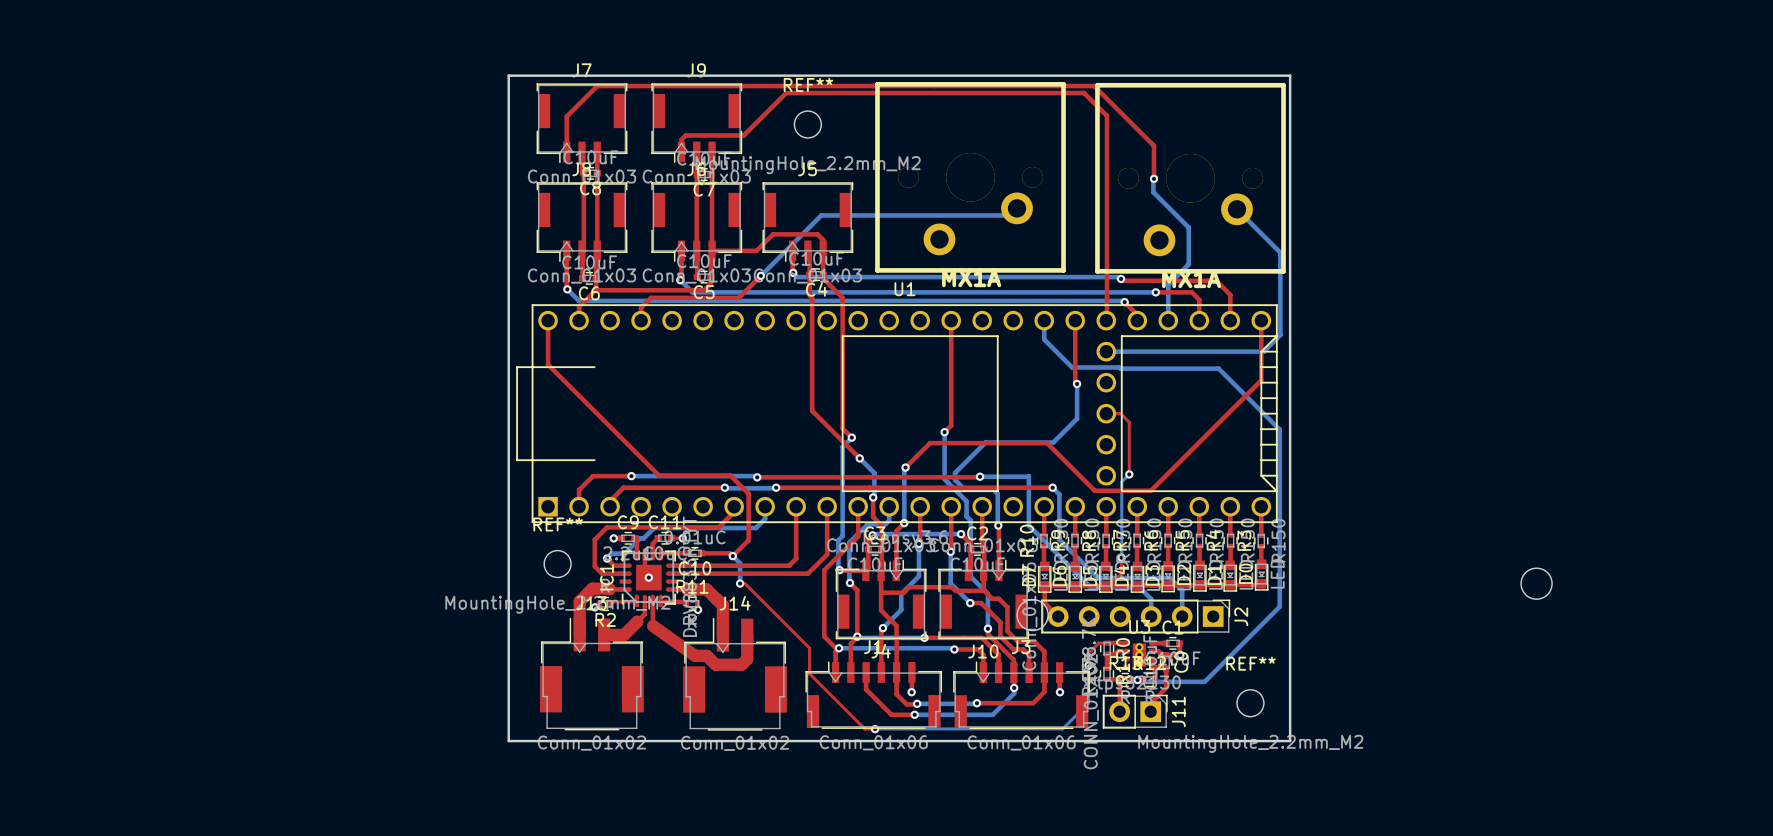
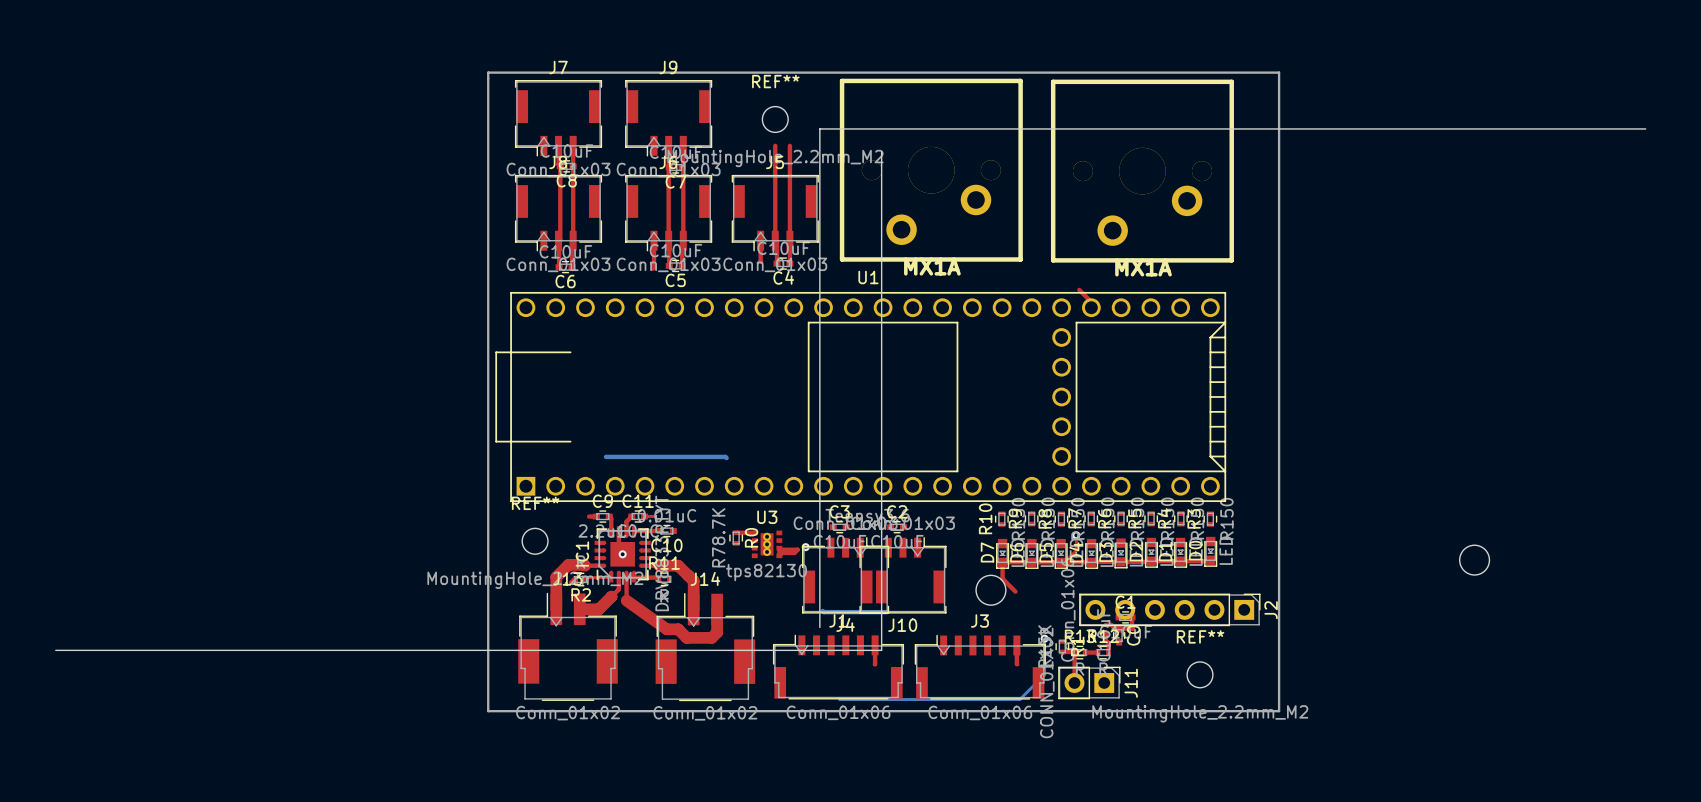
board edge: (508, 75) (508, 741) (1290, 741) (1290, 75) (508, 75) -> none
line: none -> (488, 72) (488, 711) (1279, 711) (1279, 72) (488, 72)
board edge: none -> (1645, 128) (819, 128) (819, 627)
top track: (566, 151) (566, 116) (597, 86) (1094, 86) (1154, 145) (1154, 178) -> none
top track: (681, 151) (681, 139) (685, 135) (743, 135) (786, 93) (1084, 93) (1106, 115) (1106, 320) -> none
top track: none -> (775, 145) (775, 240)
board edge: none -> (881, 151) (881, 650) (55, 650)
bottom track: (1154, 178) (1153, 192) (1188, 227) (1188, 264) (1168, 284) (1168, 320) -> none
via: (1154, 178) -> none
bottom track: (1017, 208) (1009, 215) (821, 215) (760, 275) -> none
bottom track: (1237, 209) (1280, 252) (1280, 335) (1263, 351) (1106, 351) -> none
top track: (823, 239) (817, 234) (773, 234) (756, 250) (712, 250) -> (789, 230) (789, 145)
top track: (566, 250) (567, 289) -> none
bottom track: (793, 272) (797, 277) (1119, 277) (1121, 278) -> none
via: (793, 272) -> none
top track: (809, 274) (809, 295) (812, 297) (812, 410) (859, 458) -> none
top track: (823, 274) (823, 278) (842, 297) (842, 428) (851, 437) -> none
top track: (760, 275) (738, 297) (650, 297) (641, 307) (641, 320) -> none
via: (760, 275) -> none
top track: (710, 277) (710, 283) (704, 290) (596, 290) (596, 278) -> none
top track: (1121, 278) (1122, 280) (1216, 280) (1230, 294) (1230, 320) -> none
via: (1121, 278) -> none
bottom track: (680, 280) (692, 292) (1155, 292) -> none
via: (680, 280) -> none
bottom track: (567, 289) (578, 300) (1124, 302) -> none
via: (567, 289) -> none
top track: (596, 289) (579, 306) (579, 320) -> none
top track: (1155, 292) (1191, 292) (1199, 299) (1199, 320) -> none
via: (1155, 292) -> none
via: (1124, 302) -> none
top track: (548, 320) (548, 364) (658, 475) (730, 475) (748, 493) (748, 540) (732, 556) (730, 553) (701, 553) -> none
top track: (951, 320) (951, 425) (944, 432) -> none
bottom track: (1044, 320) (1044, 339) (1072, 367) (1218, 368) (1279, 429) (1279, 606) (1204, 681) (1139, 681) (1137, 680) -> none
top track: (1075, 320) (1075, 382) (1077, 383) -> none
top track: (1261, 320) (1261, 380) (1150, 490) (1094, 490) (1047, 443) (929, 443) (905, 467) -> none
bottom track: (1077, 383) (1077, 418) (1053, 442) (985, 442) (954, 473) (954, 479) (964, 488) (992, 488) (997, 493) (998, 525) -> none
via: (1077, 383) -> none
top track: (1106, 413) (1120, 413) (1129, 422) (1129, 474) -> none
bottom track: (944, 432) (944, 479) (948, 482) -> none
via: (944, 432) -> none
bottom track: (851, 437) (842, 446) (842, 535) (838, 540) (839, 570) -> none
via: (851, 437) -> none
bottom track: (859, 458) (874, 473) (873, 497) -> none
via: (859, 458) -> none
bottom track: (905, 467) (904, 523) -> none
via: (905, 467) -> none
bottom track: (1129, 474) (1121, 481) (1121, 557) -> none
via: (1129, 474) -> none
top track: (631, 476) (592, 476) (579, 490) (579, 506) -> none
via: (631, 476) -> none
top track: (980, 476) (757, 477) -> none
bottom track: (980, 476) (1028, 476) (1028, 525) (1090, 587) (1139, 587) (1151, 599) (1151, 616) -> none
via: (980, 476) -> none
via: (757, 477) -> none
bottom track: (948, 482) (966, 501) (966, 516) (970, 520) (970, 576) (987, 593) (987, 628) -> none
top track: (724, 487) (623, 487) (610, 501) (610, 506) -> none
bottom track: (724, 487) (776, 487) -> none
via: (724, 487) -> none
top track: (776, 487) (1052, 487) -> none
via: (776, 487) -> none
bottom track: (1052, 487) (1059, 494) (1059, 539) (1097, 578) (1169, 578) (1182, 590) (1182, 616) -> none
via: (1052, 487) -> none
top track: (873, 497) (873, 517) (881, 525) (881, 610) (896, 625) (896, 694) (906, 704) (917, 703) -> none
via: (873, 497) -> none
top track: (734, 506) (734, 512) (718, 527) (607, 527) (594, 539) (594, 566) (601, 573) (624, 573) -> none
bottom track: (765, 506) (765, 518) (755, 528) (654, 528) (624, 553) (611, 553) (607, 558) -> none
top track: (796, 506) (796, 558) (789, 565) (673, 565) -> none
top track: (827, 506) (827, 554) (808, 573) (673, 573) -> none
top track: (858, 506) (858, 536) (824, 570) (824, 636) (835, 648) (839, 648) (835, 651) (835, 672) -> none
bottom track: (889, 506) (889, 520) (885, 524) (867, 524) (849, 542) (849, 582) -> none
top track: (920, 506) (918, 543) -> none
top track: (951, 506) (950, 551) -> none
top track: (982, 506) (983, 590) -> none
top track: (1044, 506) (1043, 535) -> none
top track: (1075, 506) (1075, 535) -> none
top track: (1106, 506) (1106, 535) -> none
top track: (1137, 506) (1137, 534) -> none
top track: (1168, 506) (1168, 535) -> none
top track: (1199, 506) (1199, 535) -> none
top track: (1230, 506) (1230, 535) -> none
top track: (1261, 506) (1261, 535) -> none
top track: (904, 523) (896, 531) (896, 570) -> none
via: (904, 523) -> none
top track: (998, 525) (998, 570) -> none
via: (998, 525) -> none
top track: (961, 534) (970, 543) (970, 568) (968, 570) -> none
bottom track: (961, 534) (872, 535) -> none
via: (961, 534) -> none
top track: (872, 535) (868, 539) (868, 568) (865, 570) (839, 570) -> none
via: (872, 535) -> none
via: (613, 538) -> none
via: (682, 538) -> none
bottom track: (918, 543) (918, 576) (901, 593) (901, 609) (882, 628) -> none
via: (918, 543) -> none
top track: (1043, 546) (1044, 566) -> none
top track: (1075, 546) (1075, 566) -> none
top track: (1106, 546) (1105, 566) -> none
top track: (1137, 546) (1137, 566) -> none
top track: (1168, 546) (1168, 566) -> none
top track: (1199, 546) (1199, 565) -> none
top track: (1230, 546) (1230, 565) -> none
top track: (1261, 546) (1261, 564) -> none
C2 position: (977, 549) -> (897, 527)
bottom track: (950, 551) (950, 583) (970, 603) -> none
via: (950, 551) -> none
top track: none -> (736, 532) (754, 532)
bottom track: (732, 556) (740, 563) (740, 583) -> none
via: (732, 556) -> none
top track: (607, 558) (614, 565) (624, 565) -> none
via: (607, 558) -> none
top track: none -> (779, 548) (779, 555) (782, 552) (794, 552) (797, 549) (779, 548)
top track: (849, 582) (857, 590) (857, 637) (850, 643) (850, 672) -> none
via: (849, 582) -> none
top track: (740, 583) (744, 583) (809, 648) (809, 673) (864, 729) (875, 729) -> none
via: (740, 583) -> none
top track: (983, 590) (955, 590) (951, 587) (909, 587) (903, 592) (881, 592) -> none
top track: (983, 590) (992, 598) (998, 598) (1007, 607) (1007, 631) (1017, 641) (1034, 641) (1044, 651) (1044, 691) (1033, 703) (976, 703) -> none
J10 position: (983, 599) -> (902, 575)
top track: (970, 603) (981, 603) (1000, 622) (1000, 636) (1013, 649) (1023, 649) (1029, 655) (1029, 672) -> none
via: (970, 603) -> none
via: (594, 607) -> none
via: (697, 609) -> none
J2 position: (1135, 616) -> (1169, 609)
top track: (882, 628) (881, 629) (881, 672) -> none
via: (882, 628) -> none
top track: (987, 628) (987, 634) (1013, 659) (1014, 687) -> none
via: (987, 628) -> none
via: (857, 636) -> none
top track: (924, 637) (981, 637) (998, 654) (998, 672) -> none
via: (924, 637) -> none
top track: (1126, 643) (1099, 643) (1088, 653) (1088, 665) -> none
top track: (1152, 643) (1166, 643) -> none
bottom track: (839, 648) (954, 649) -> none
via: (839, 648) -> none
R0 position: (1107, 648) -> (736, 538)
top track: (954, 649) (978, 649) (983, 654) (983, 672) -> none
via: (954, 649) -> none
top track: (1126, 651) (1107, 654) -> none
top track: (1106, 654) (1106, 667) -> none
via: (1180, 654) -> none
U3 position: (1139, 655) -> (767, 544)
top track: (1152, 667) (1164, 667) (1166, 669) (1166, 687) (1150, 703) (1150, 711) -> none
top track: (866, 672) (866, 689) (891, 714) (914, 714) -> none
via: (1137, 680) -> none
bottom track: (1014, 687) (1014, 693) (992, 714) (914, 714) -> none
via: (1014, 687) -> none
via: (911, 692) -> none
via: (1059, 692) -> none
via: (917, 703) -> none
bottom track: (976, 703) (917, 703) -> none
via: (976, 703) -> none
via: (914, 714) -> none
via: (875, 729) -> none

